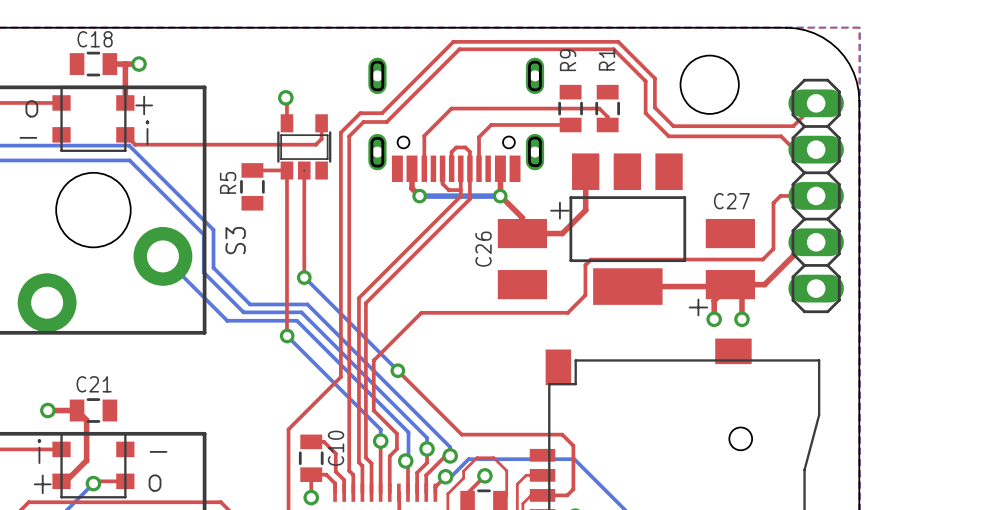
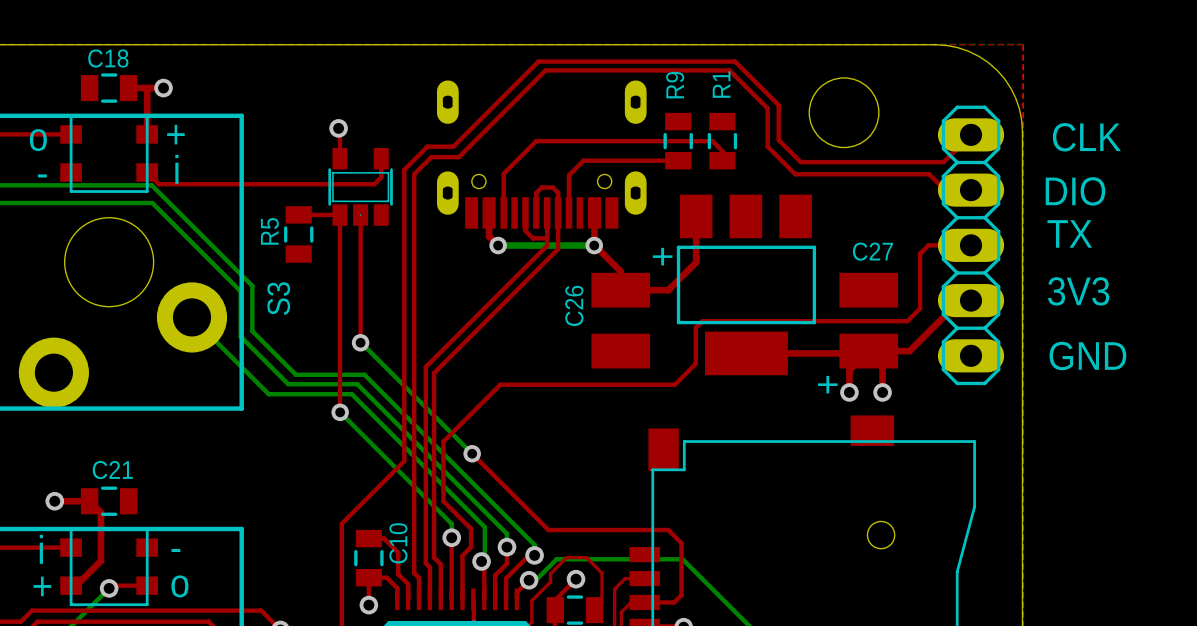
text: none -> CLK (1086, 137)
text: none -> DIO (1075, 191)
text: none -> TX (1069, 233)
text: none -> 3V3 (1078, 291)
text: none -> GND (1087, 355)

